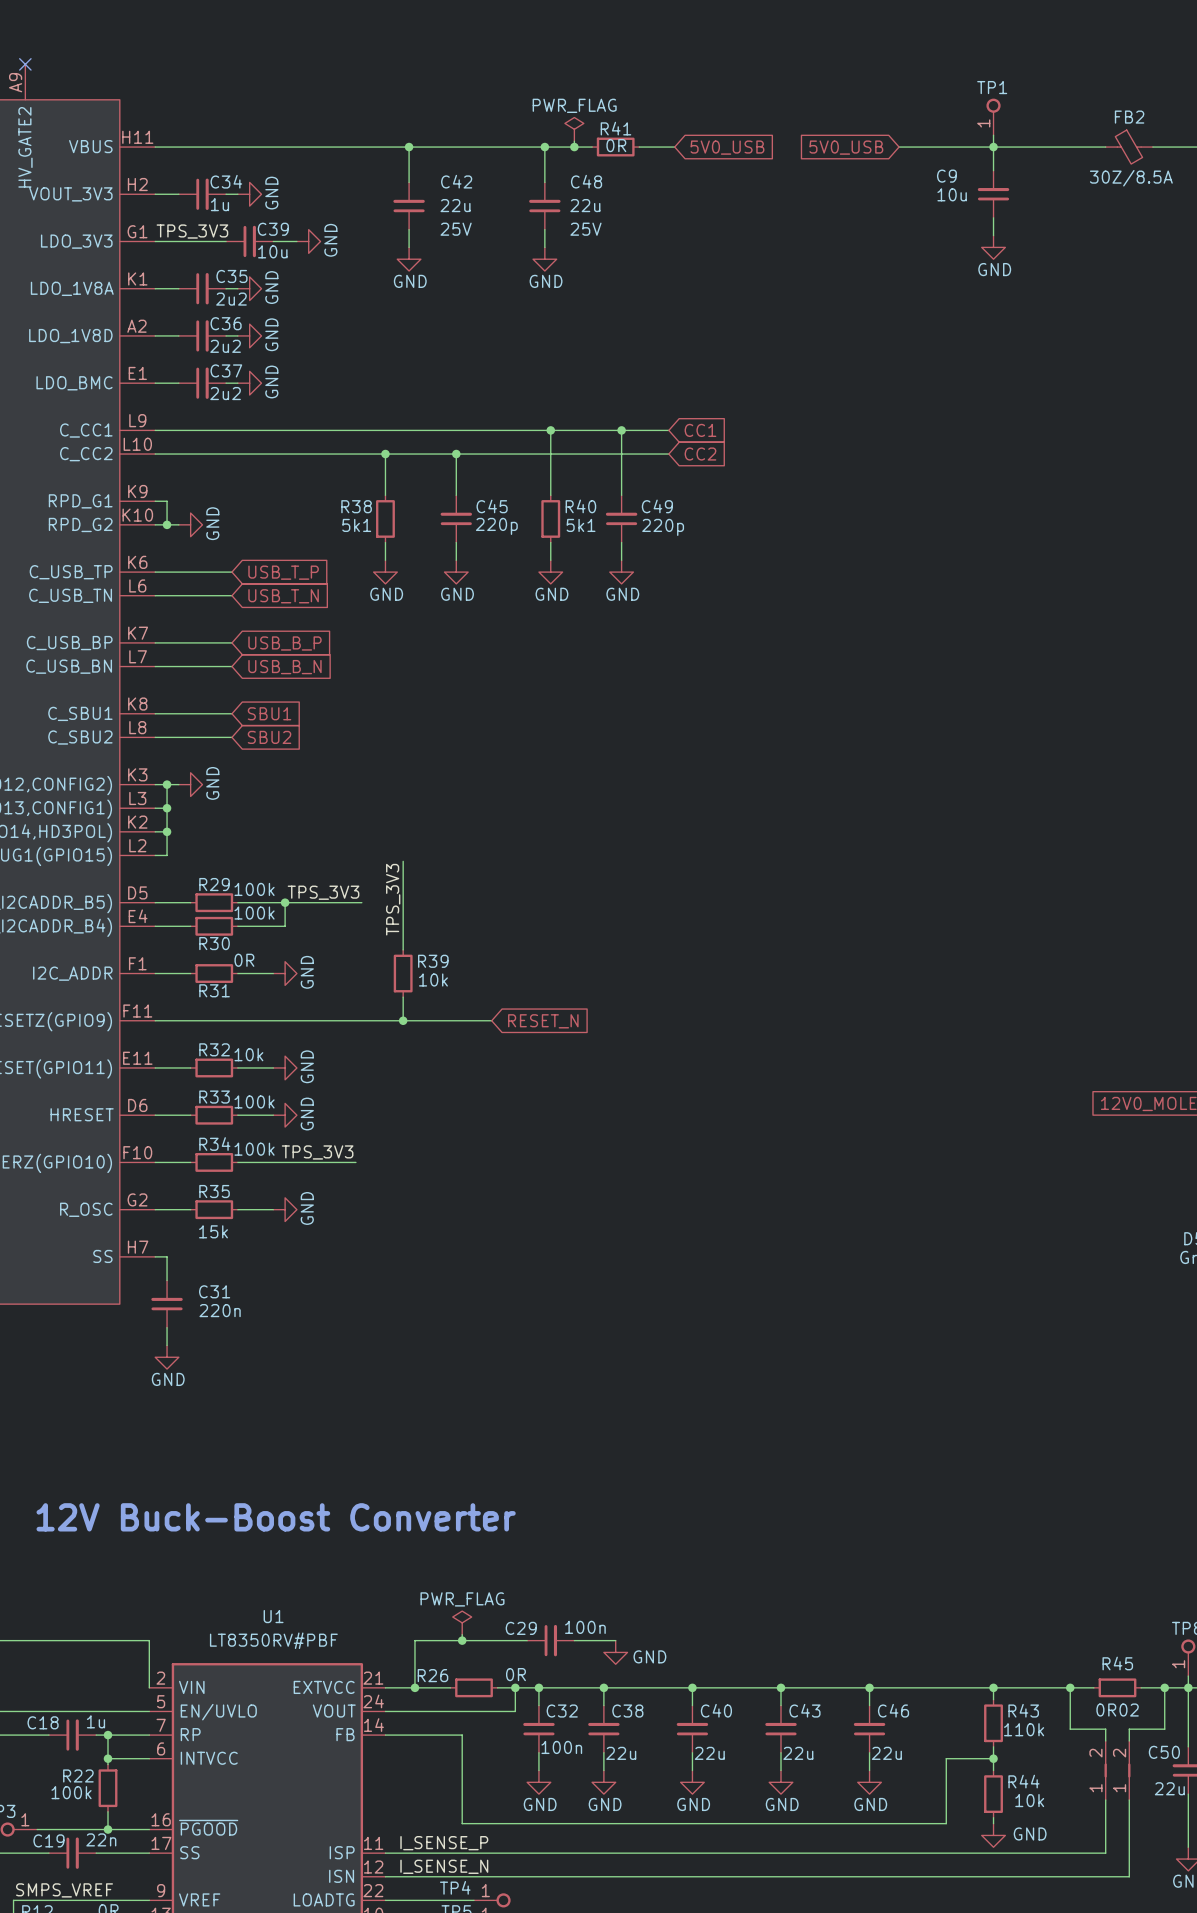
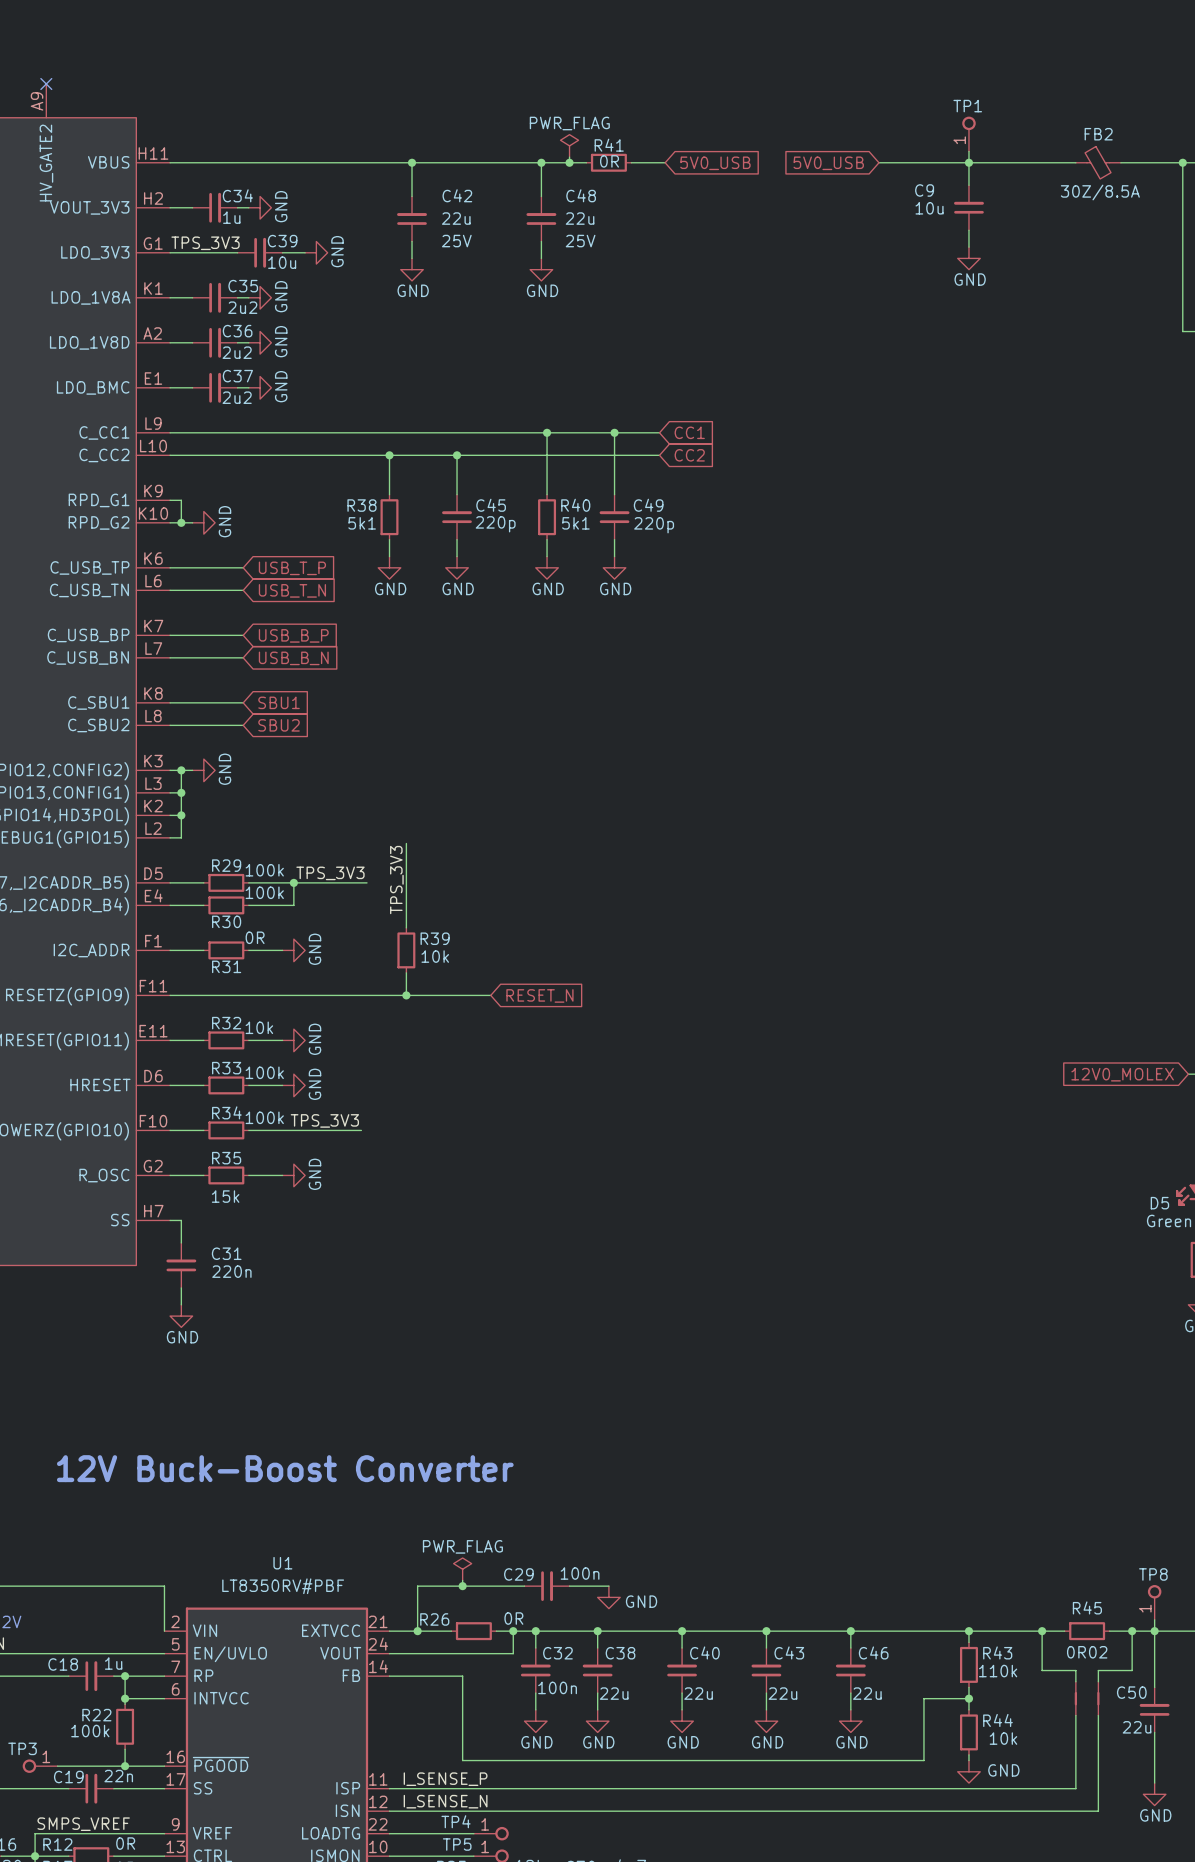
part: none -> (1075, 1698)
part: none -> (1098, 1698)
part: (1105, 1770) -> none
part: (1129, 1770) -> none

